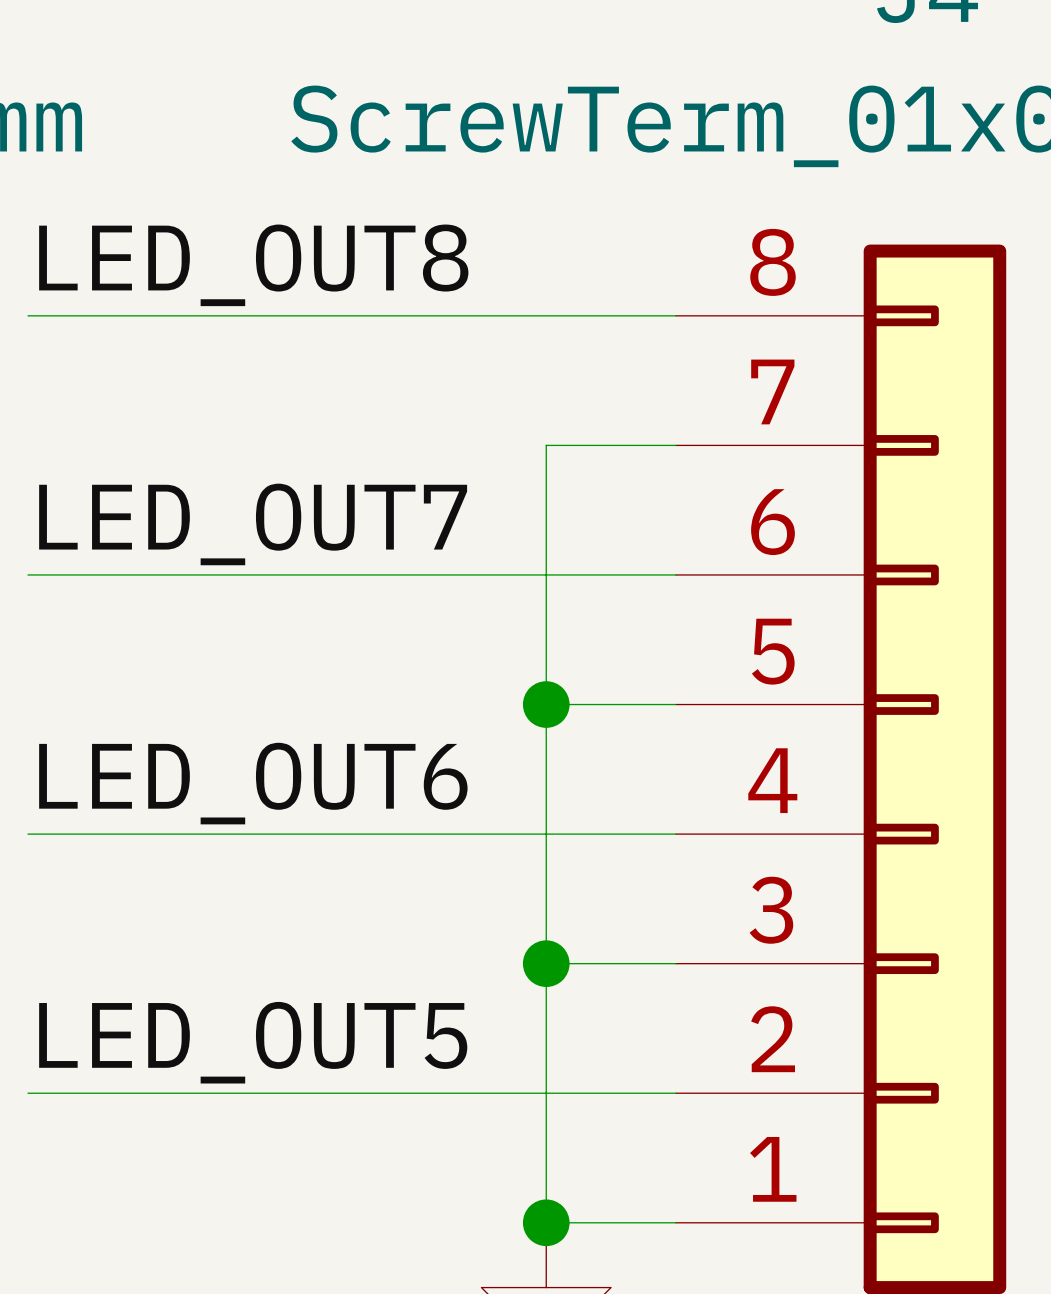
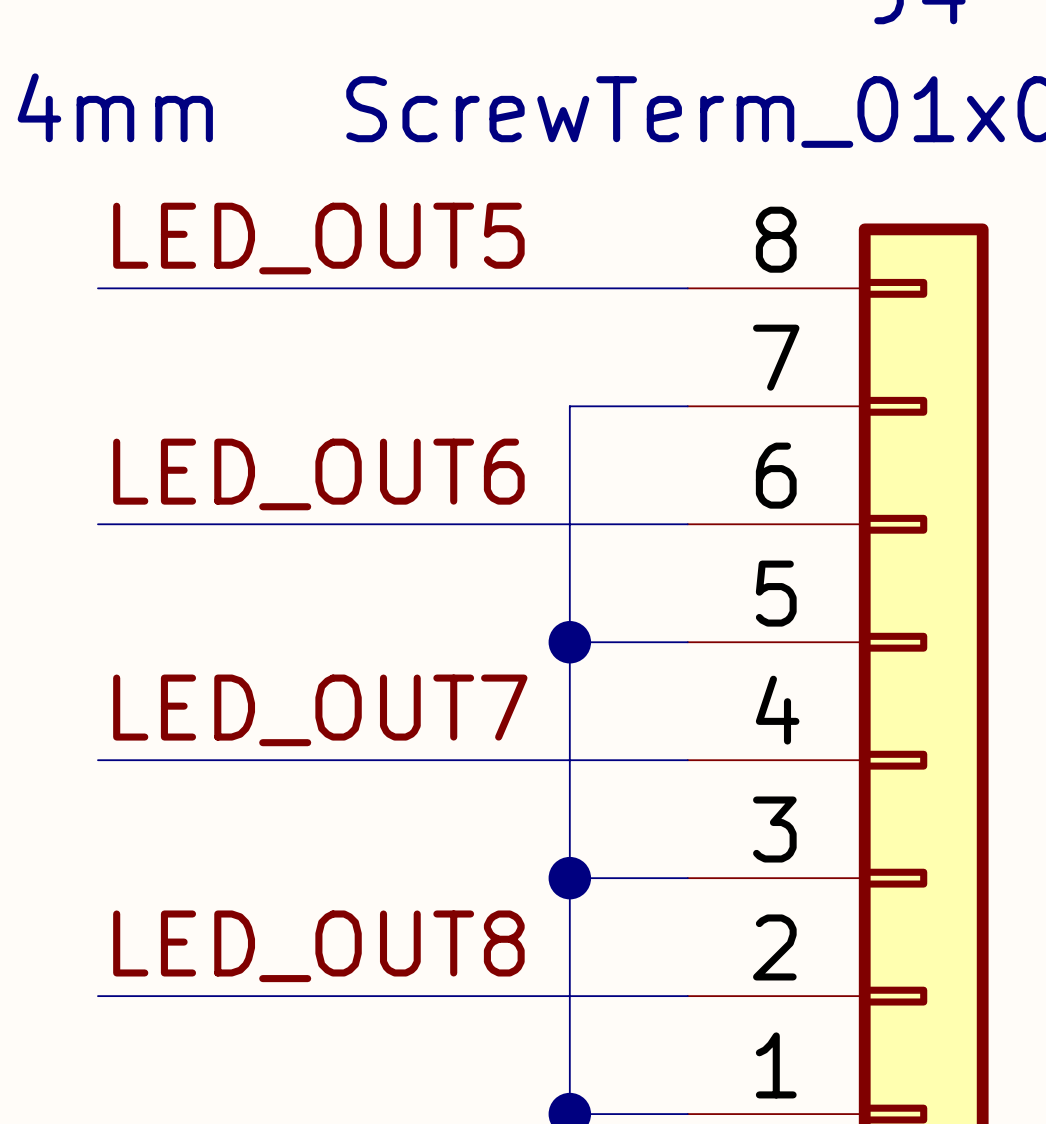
label: LED_OUT8 (253, 265) -> LED_OUT5 (318, 238)
label: LED_OUT7 (253, 524) -> LED_OUT6 (318, 474)
label: LED_OUT6 (253, 783) -> LED_OUT7 (320, 710)
label: LED_OUT5 (253, 1042) -> LED_OUT8 (318, 946)

